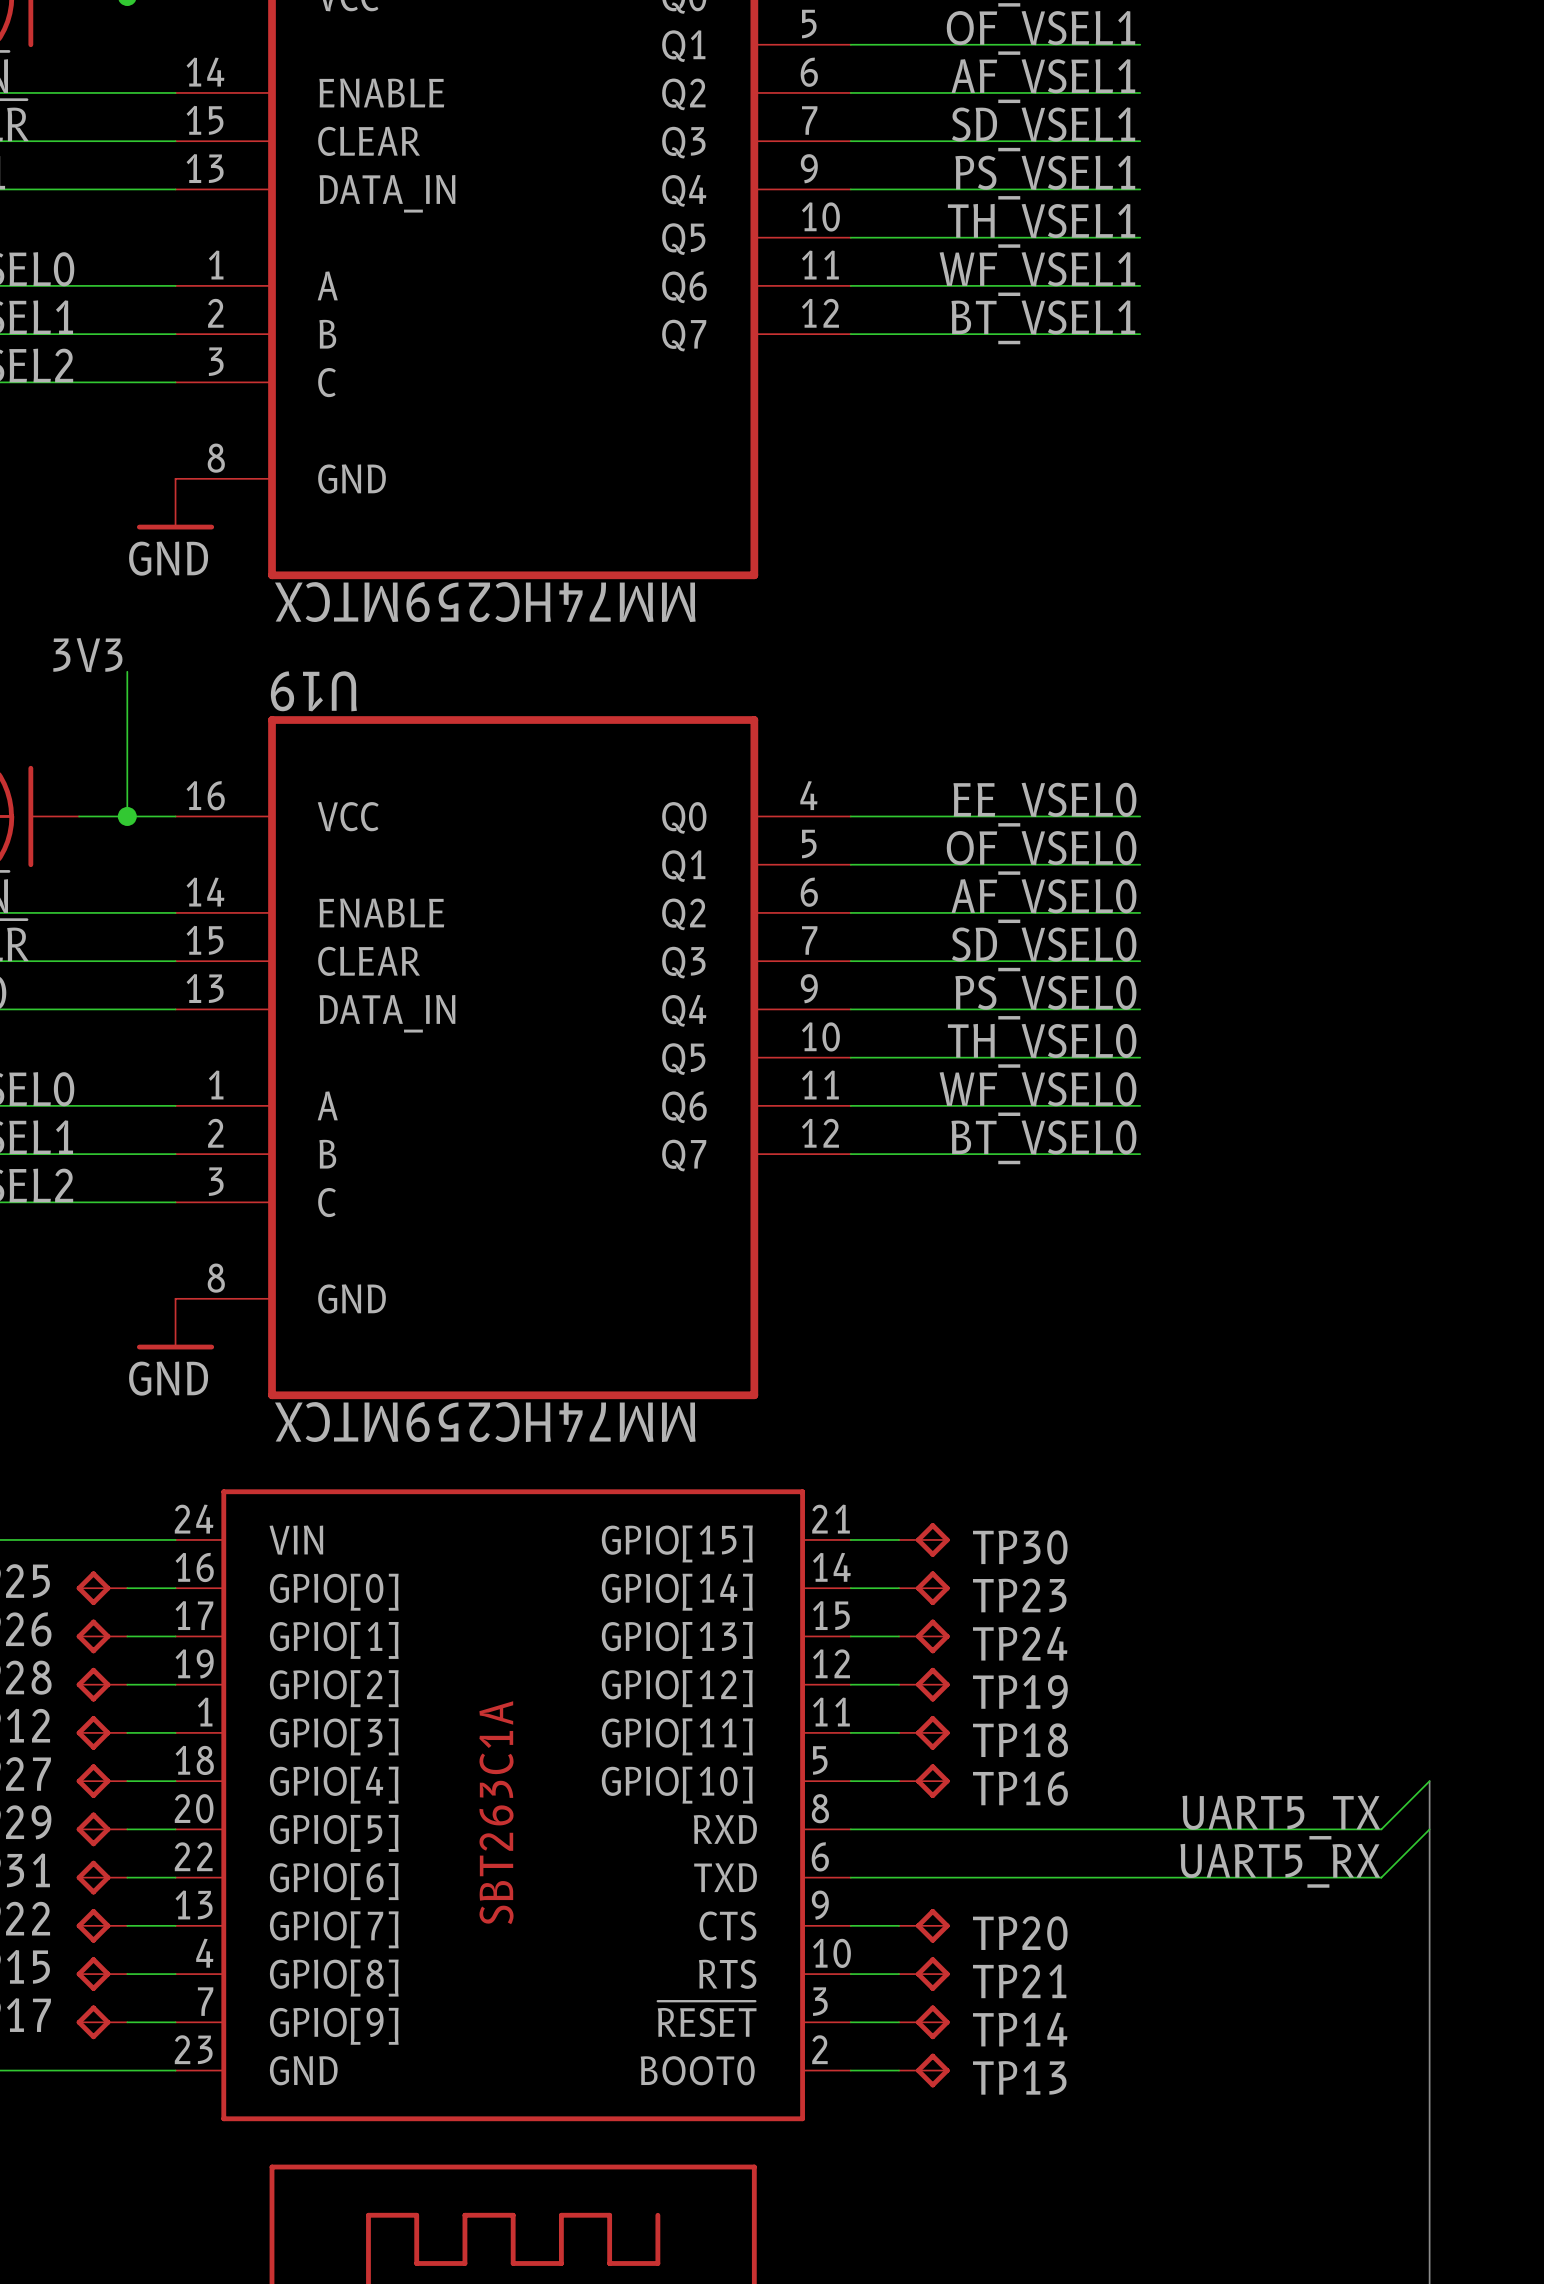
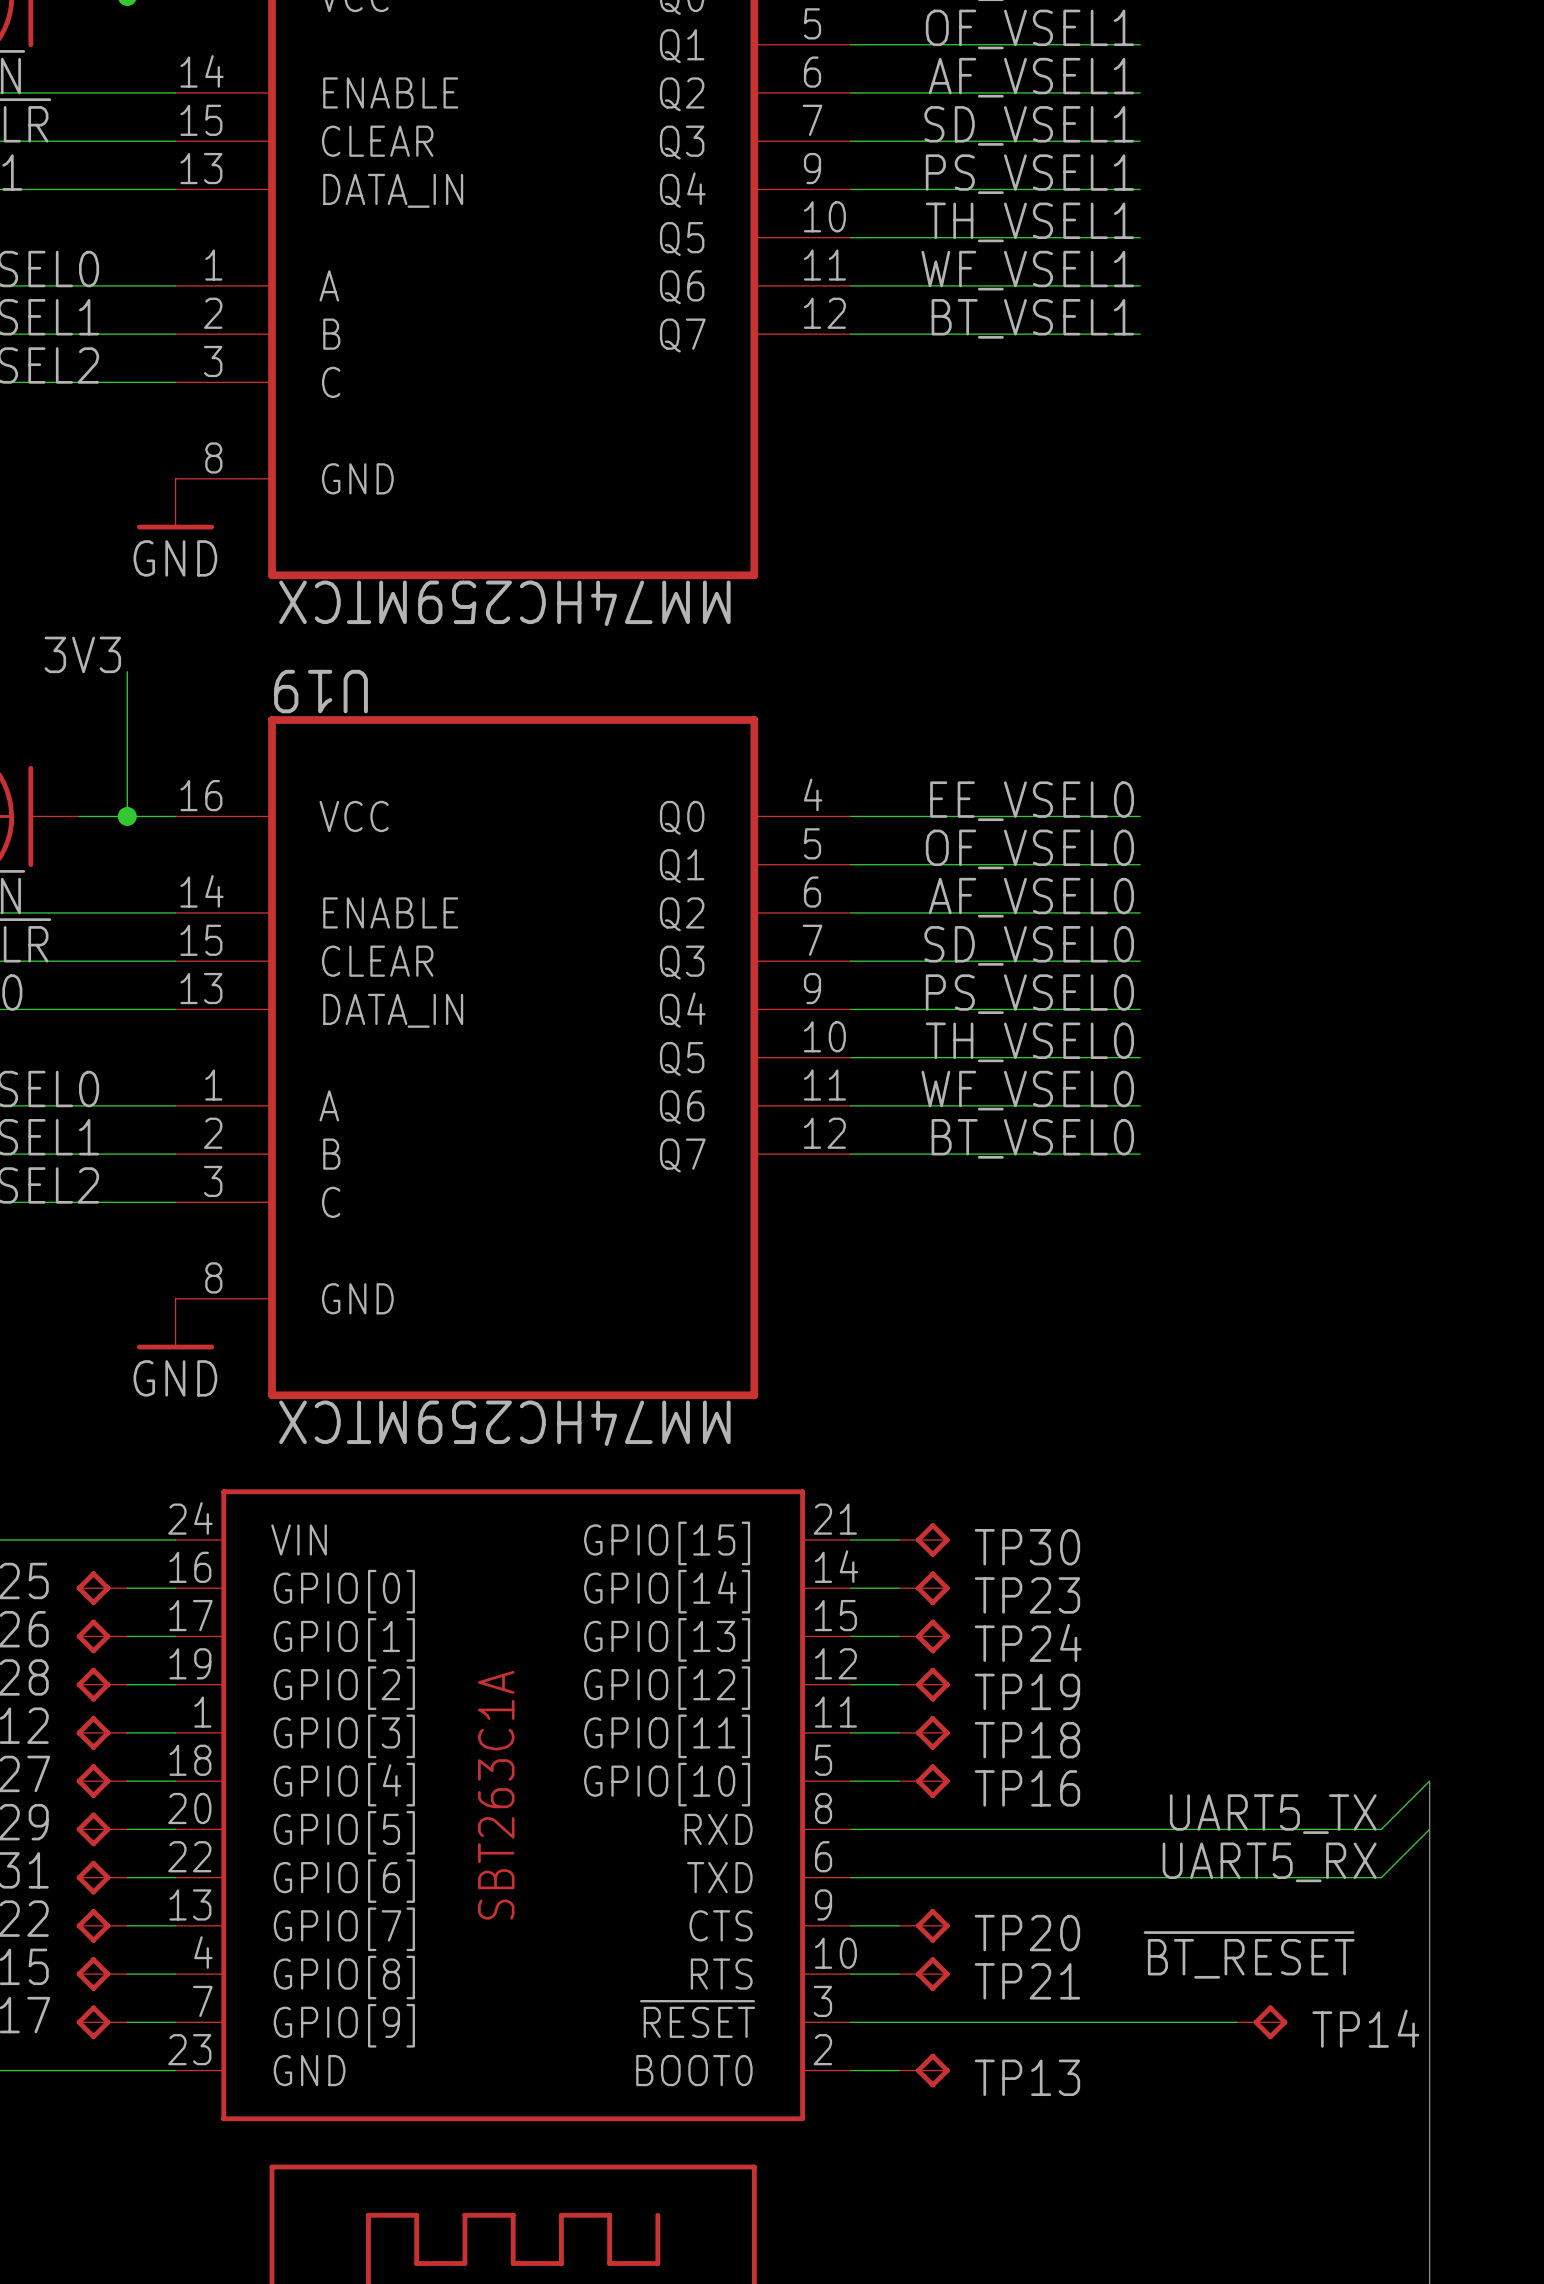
label: none -> ~{BT_RESET} (1249, 1954)
wire: none -> (899, 2022) (1236, 2022)
TP14 position: (924, 2022) -> (1262, 2022)

